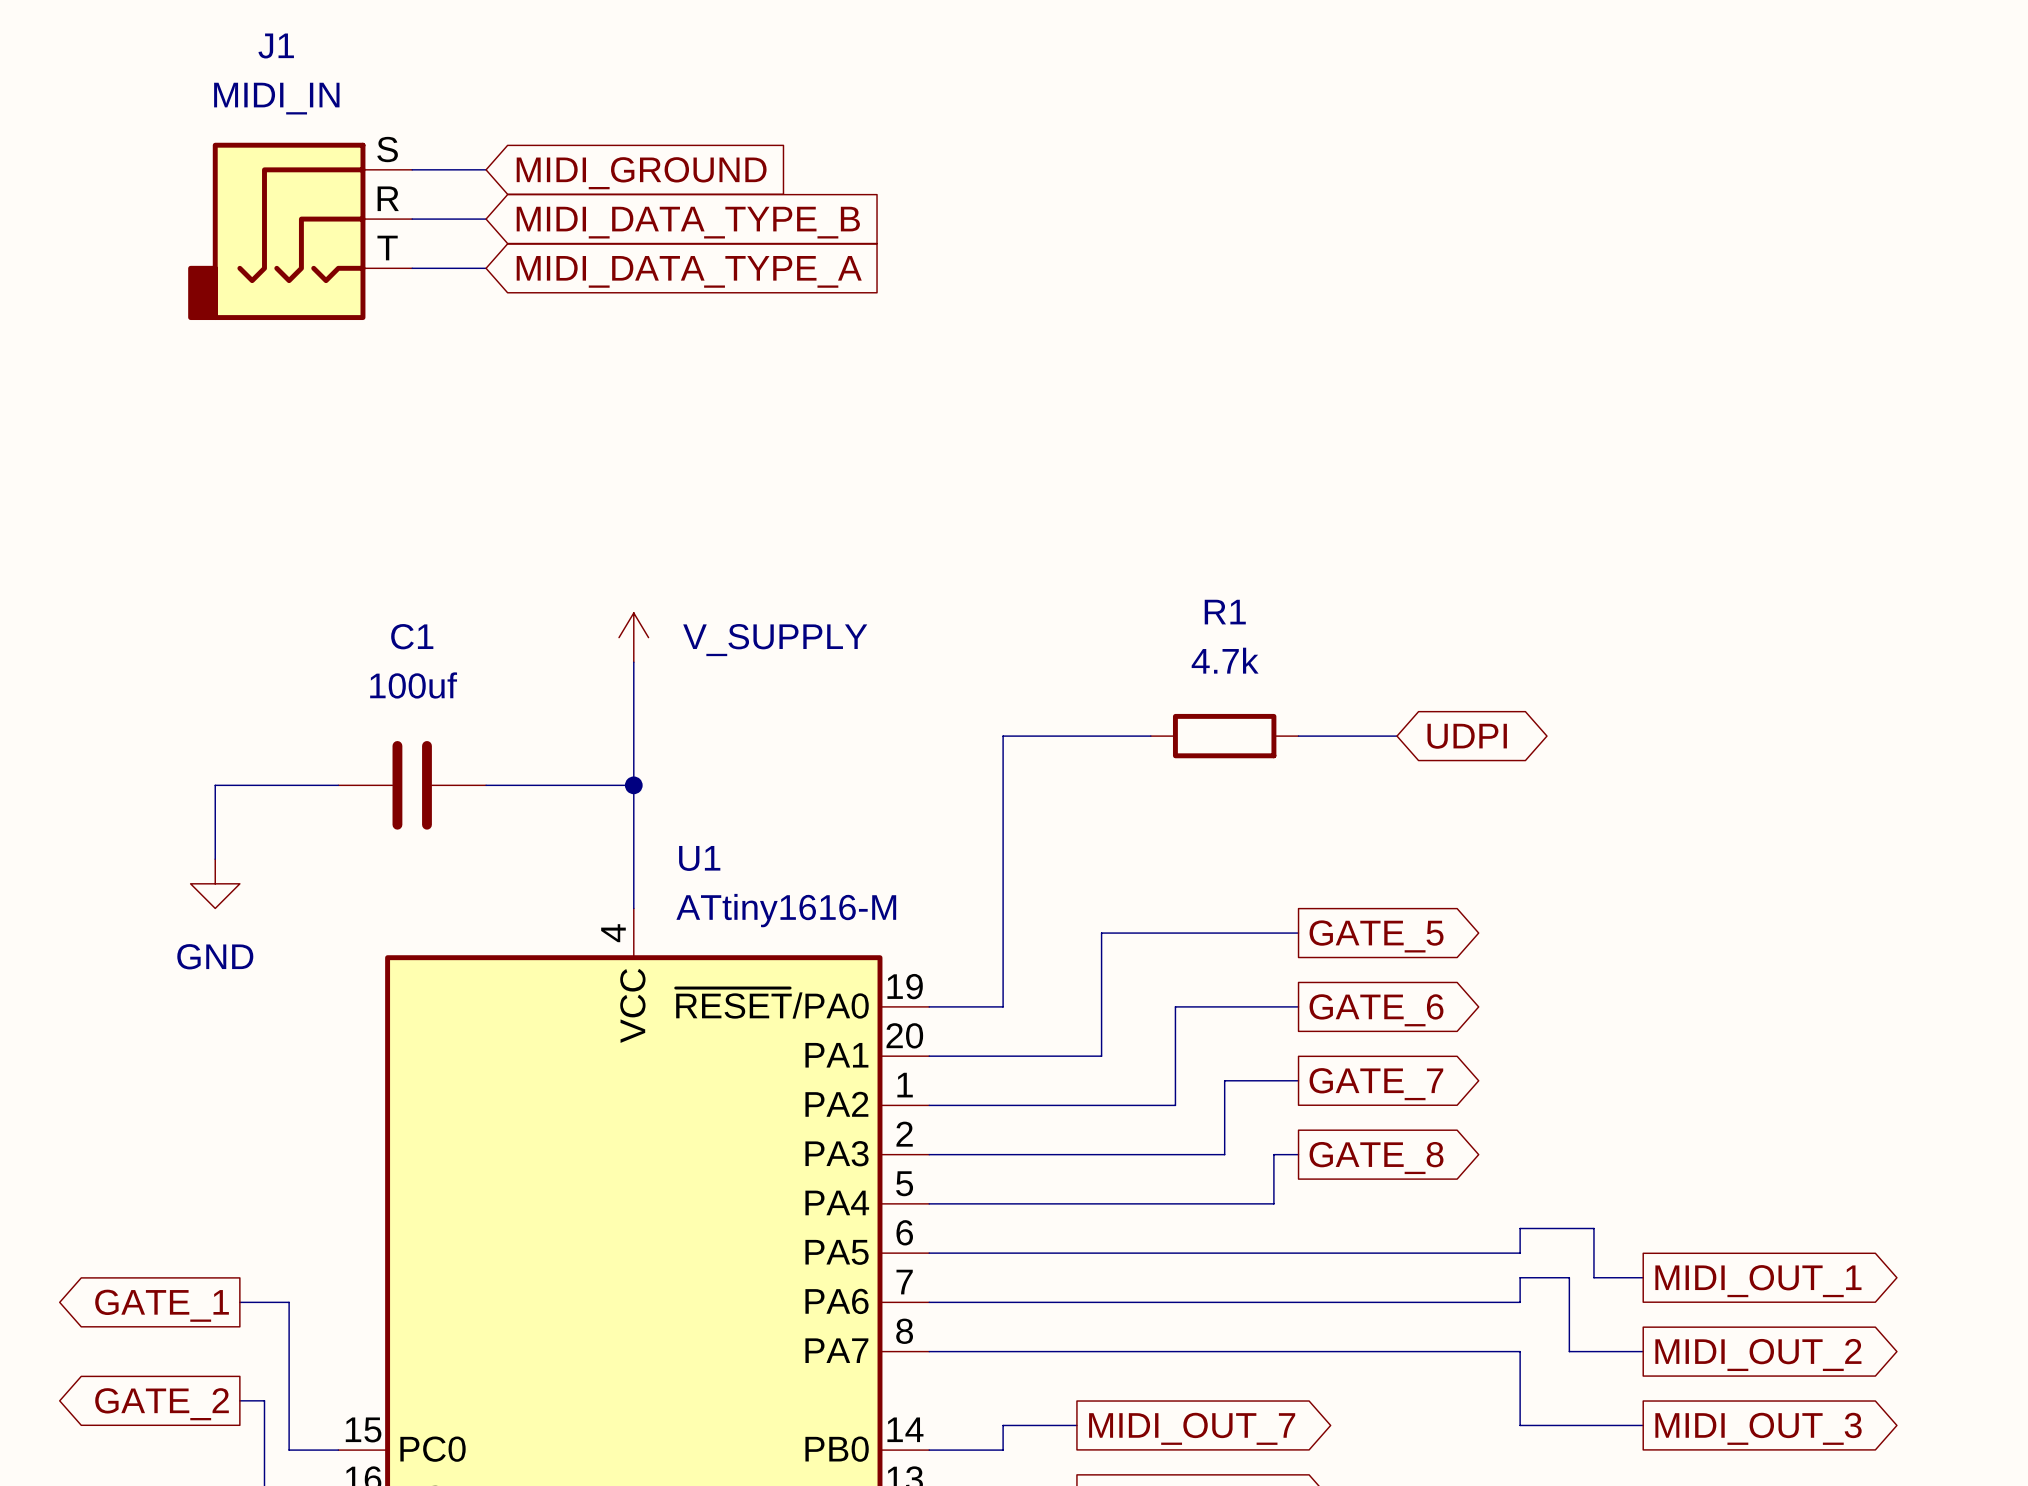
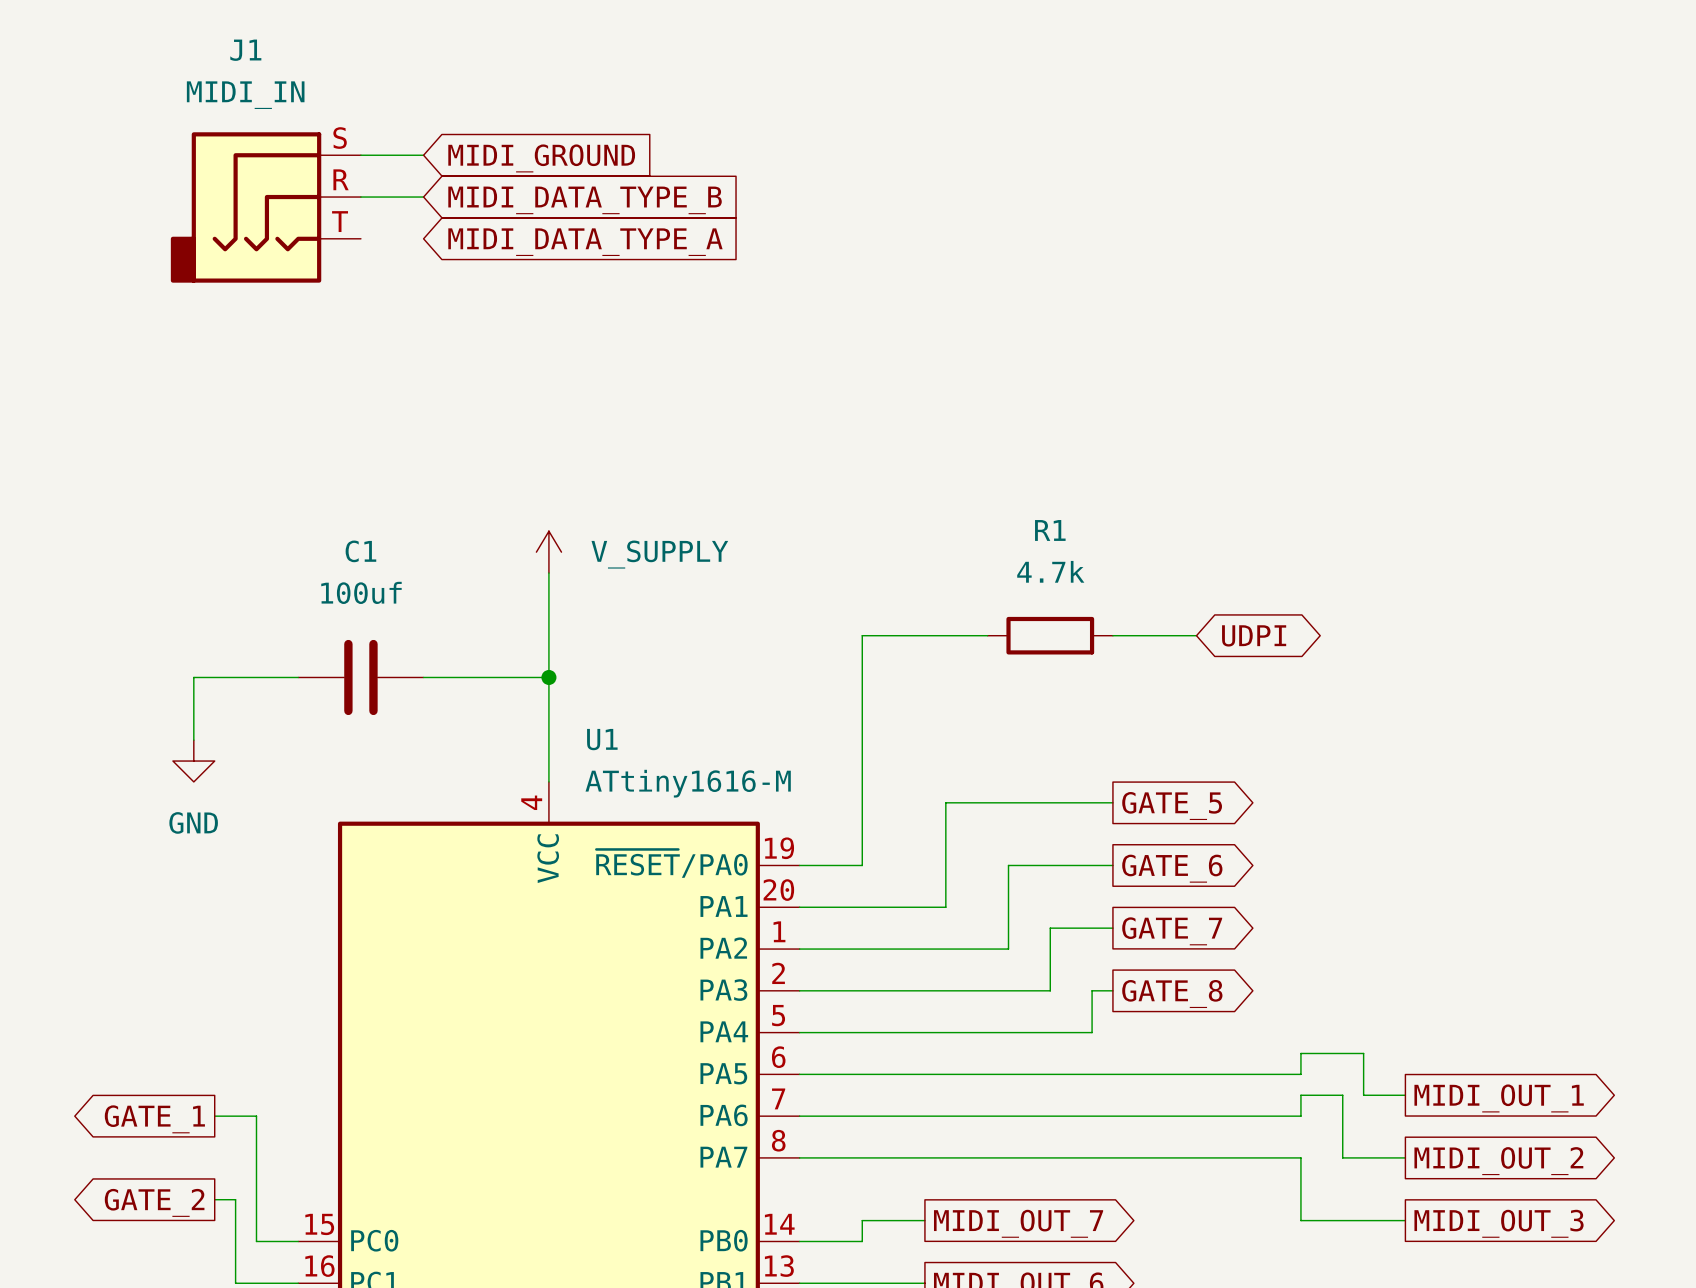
wire: (412, 268) (486, 268) -> none

